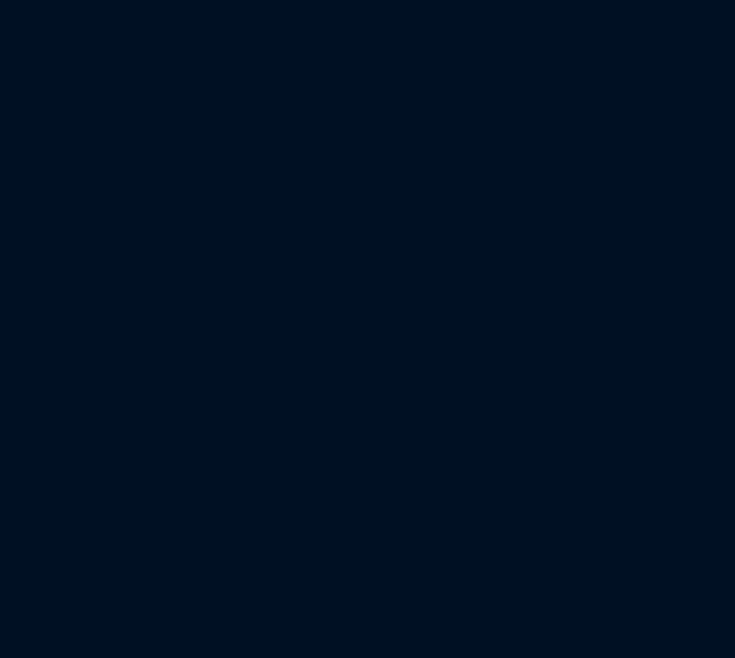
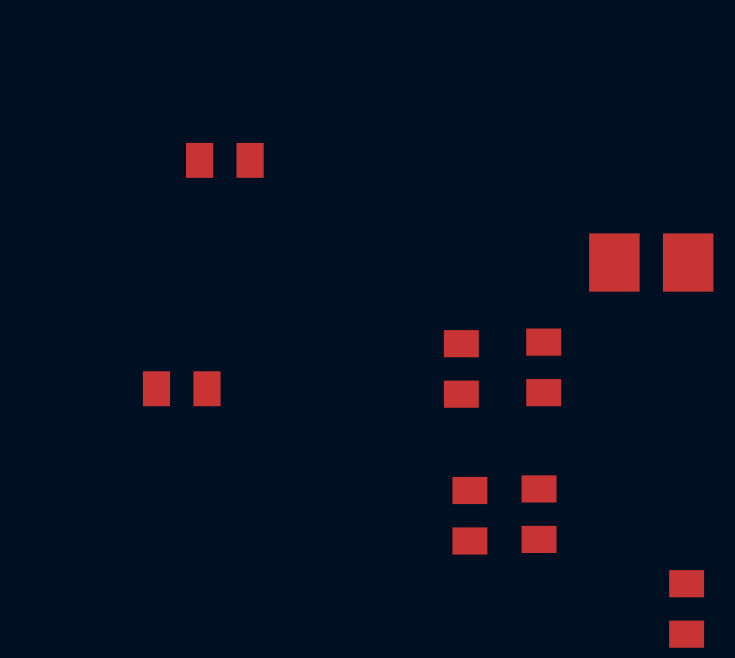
part: none -> (224, 160)
part: none -> (651, 262)
part: none -> (543, 367)
part: none -> (461, 368)
part: none -> (181, 388)
part: none -> (539, 514)
part: none -> (469, 515)
part: none -> (686, 608)

